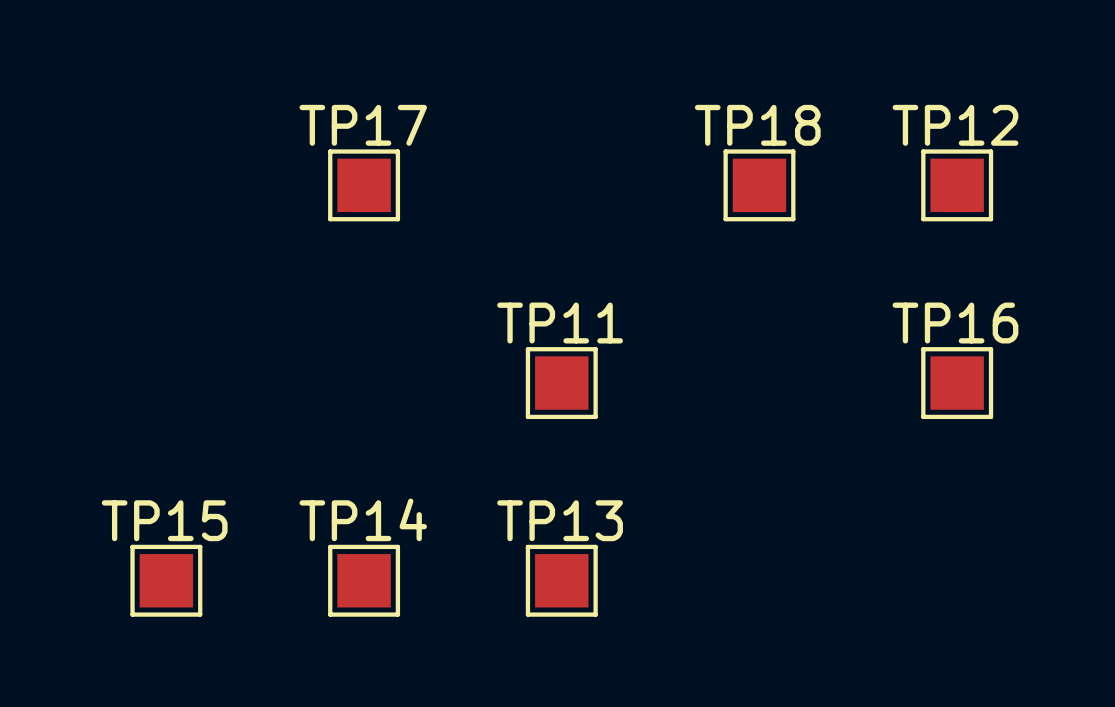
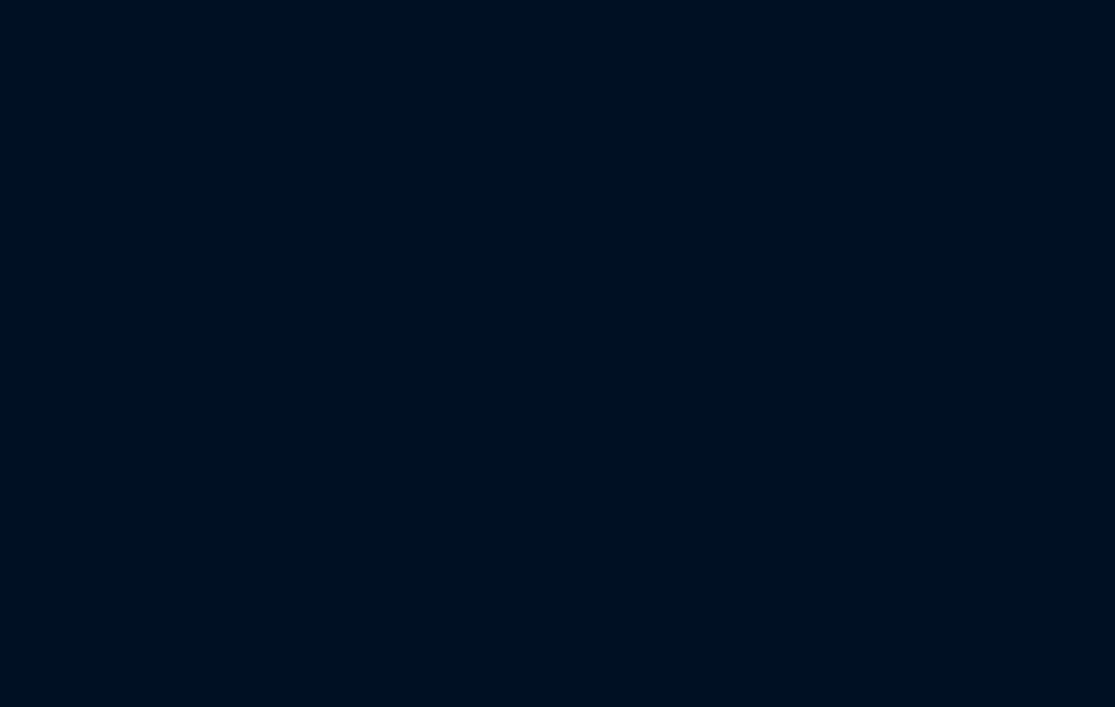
TP17: (364, 185) -> none
TP18: (759, 185) -> none
TP12: (957, 185) -> none
TP11: (561, 383) -> none
TP16: (957, 383) -> none
TP15: (166, 580) -> none
TP14: (364, 580) -> none
TP13: (561, 580) -> none

